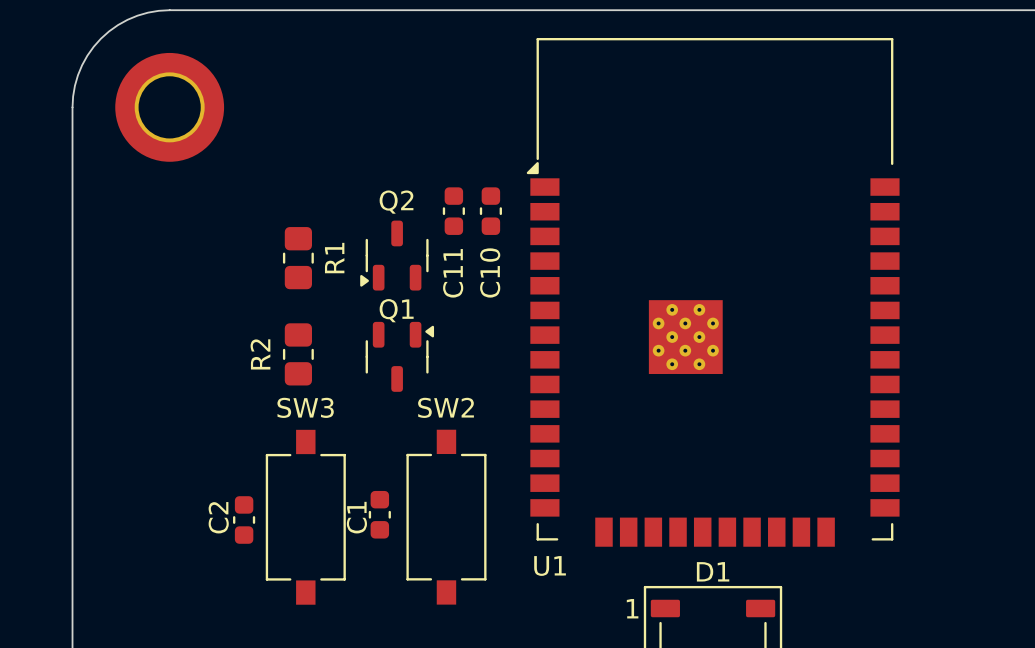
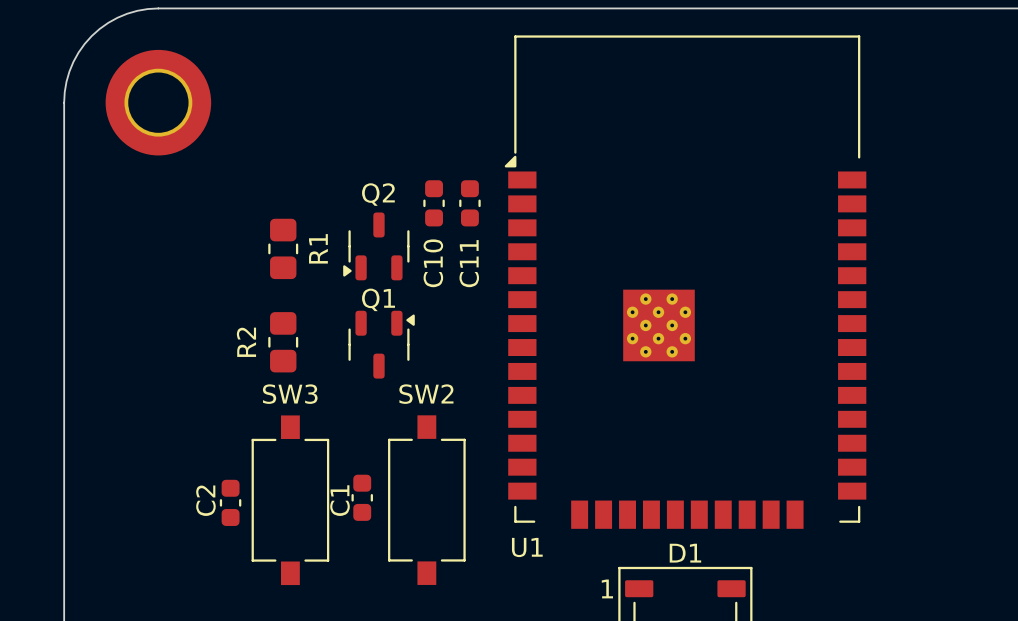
C10 name: C10 (490, 272) -> C11 (469, 263)
C11 name: C11 (453, 273) -> C10 (433, 263)

